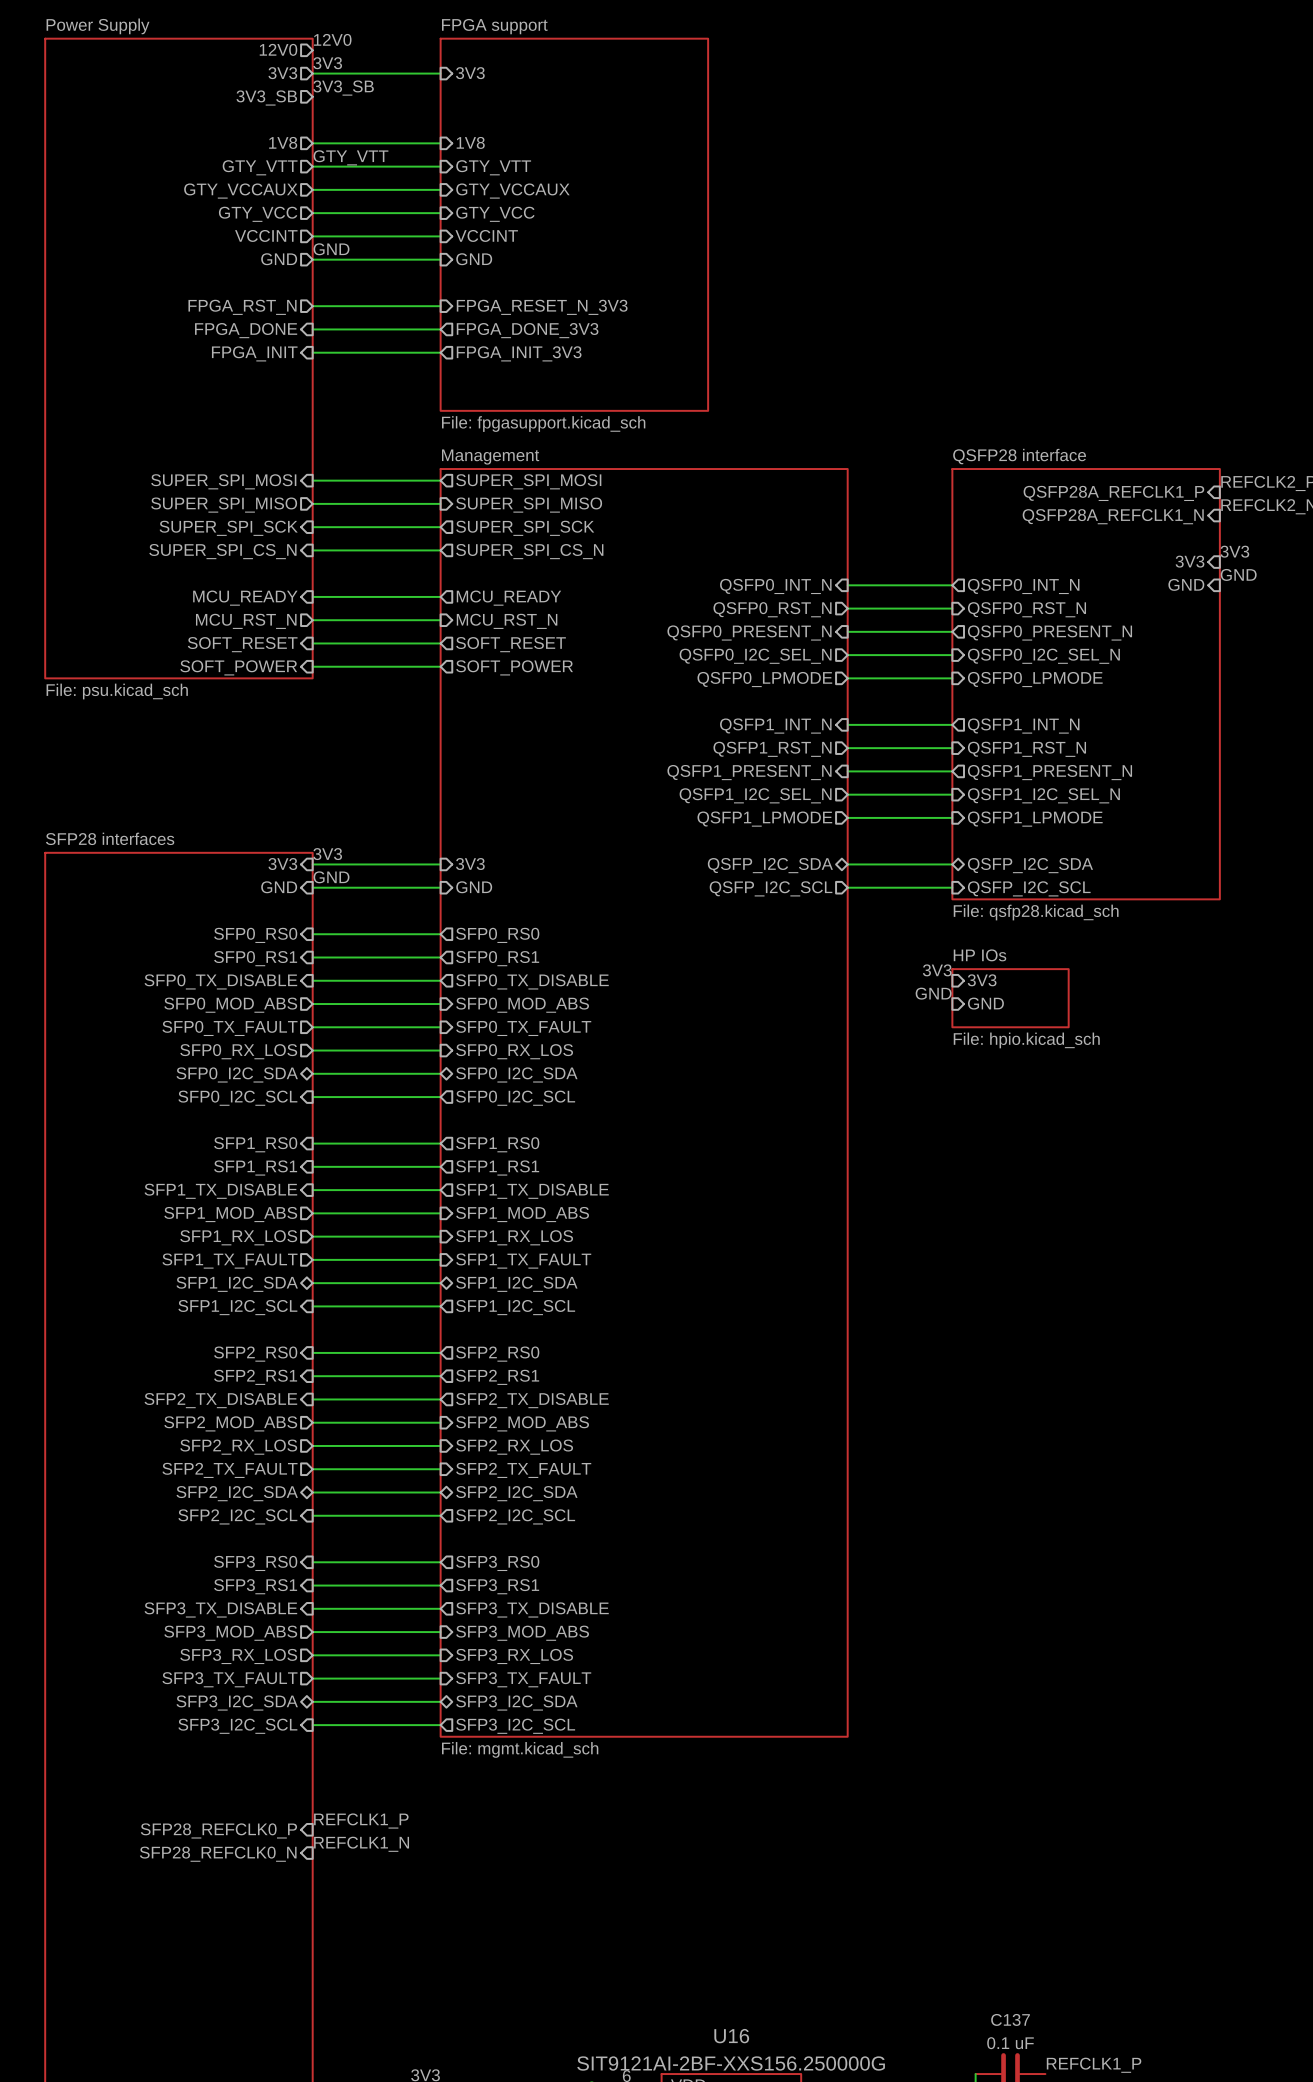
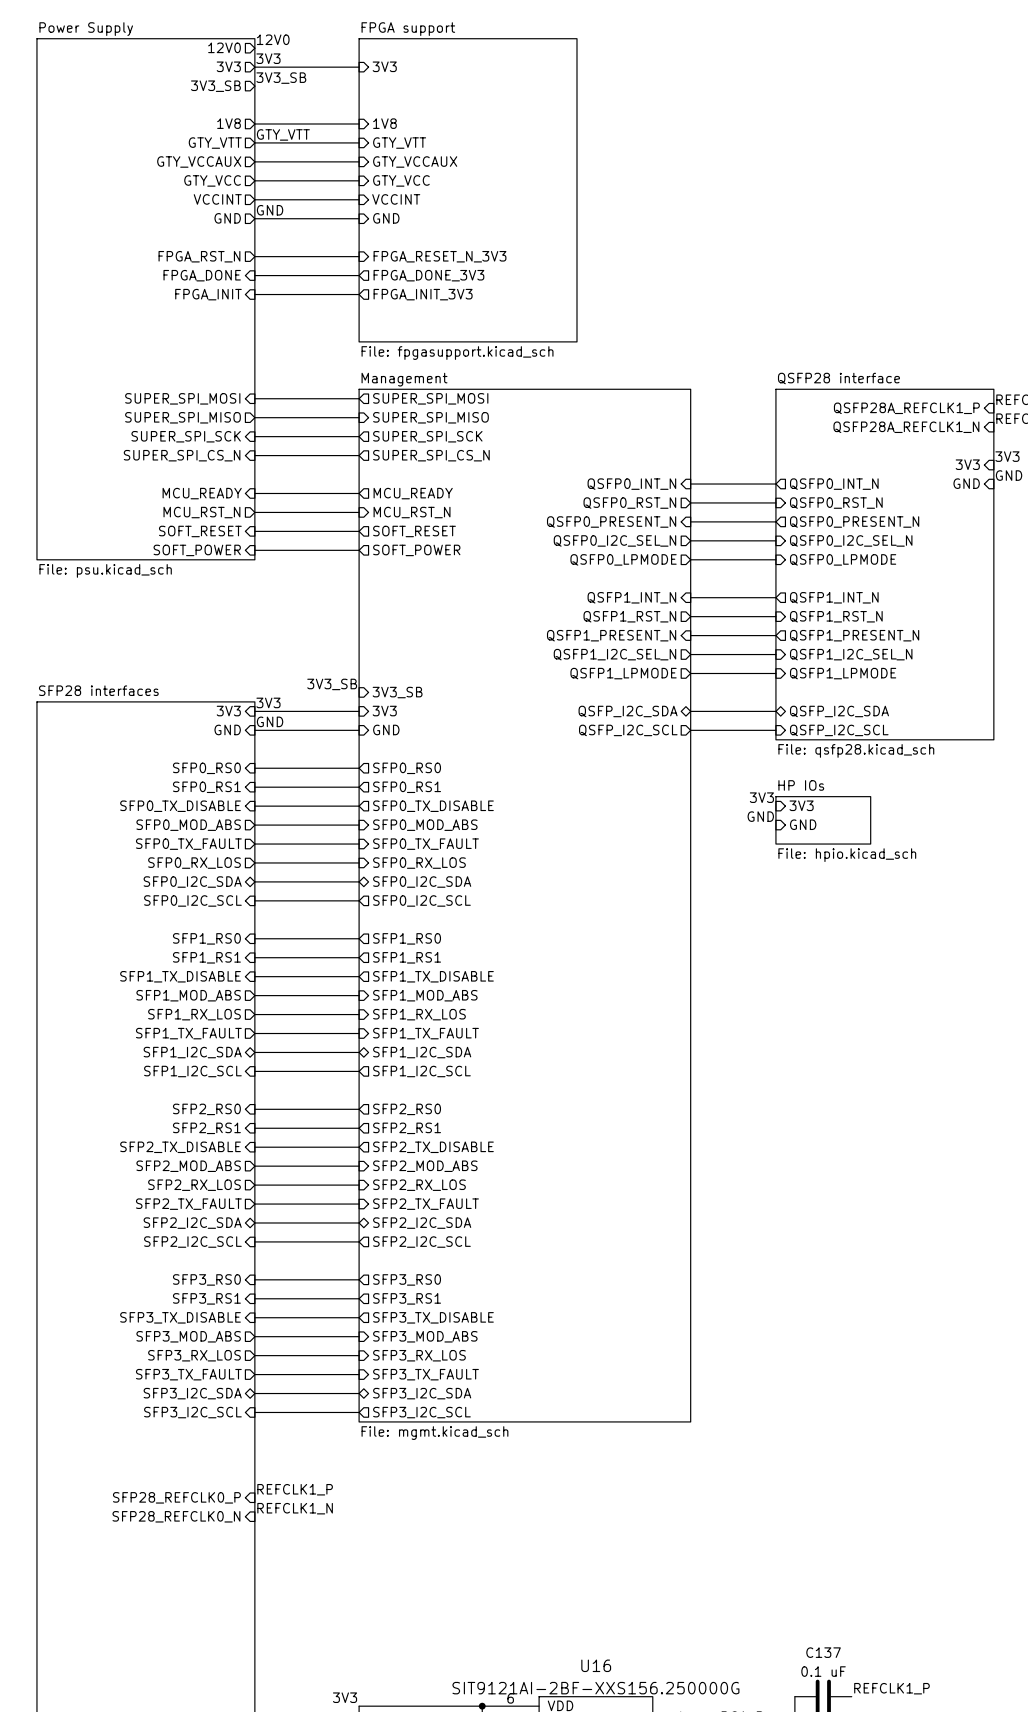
label: none -> 3V3_SB (332, 684)
sheet pin: none -> 3V3_SB (397, 692)

